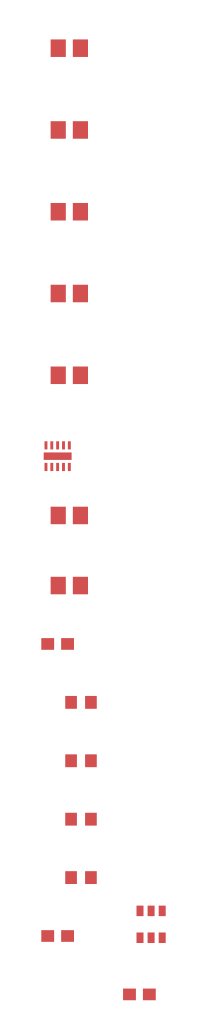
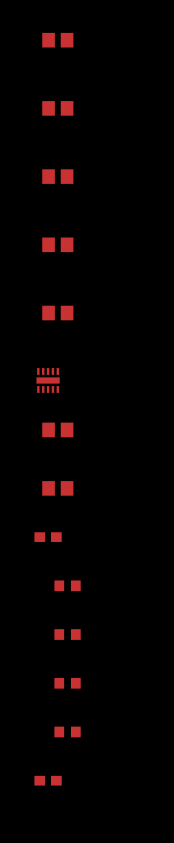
part: (151, 924) -> none
part: (139, 994) -> none

